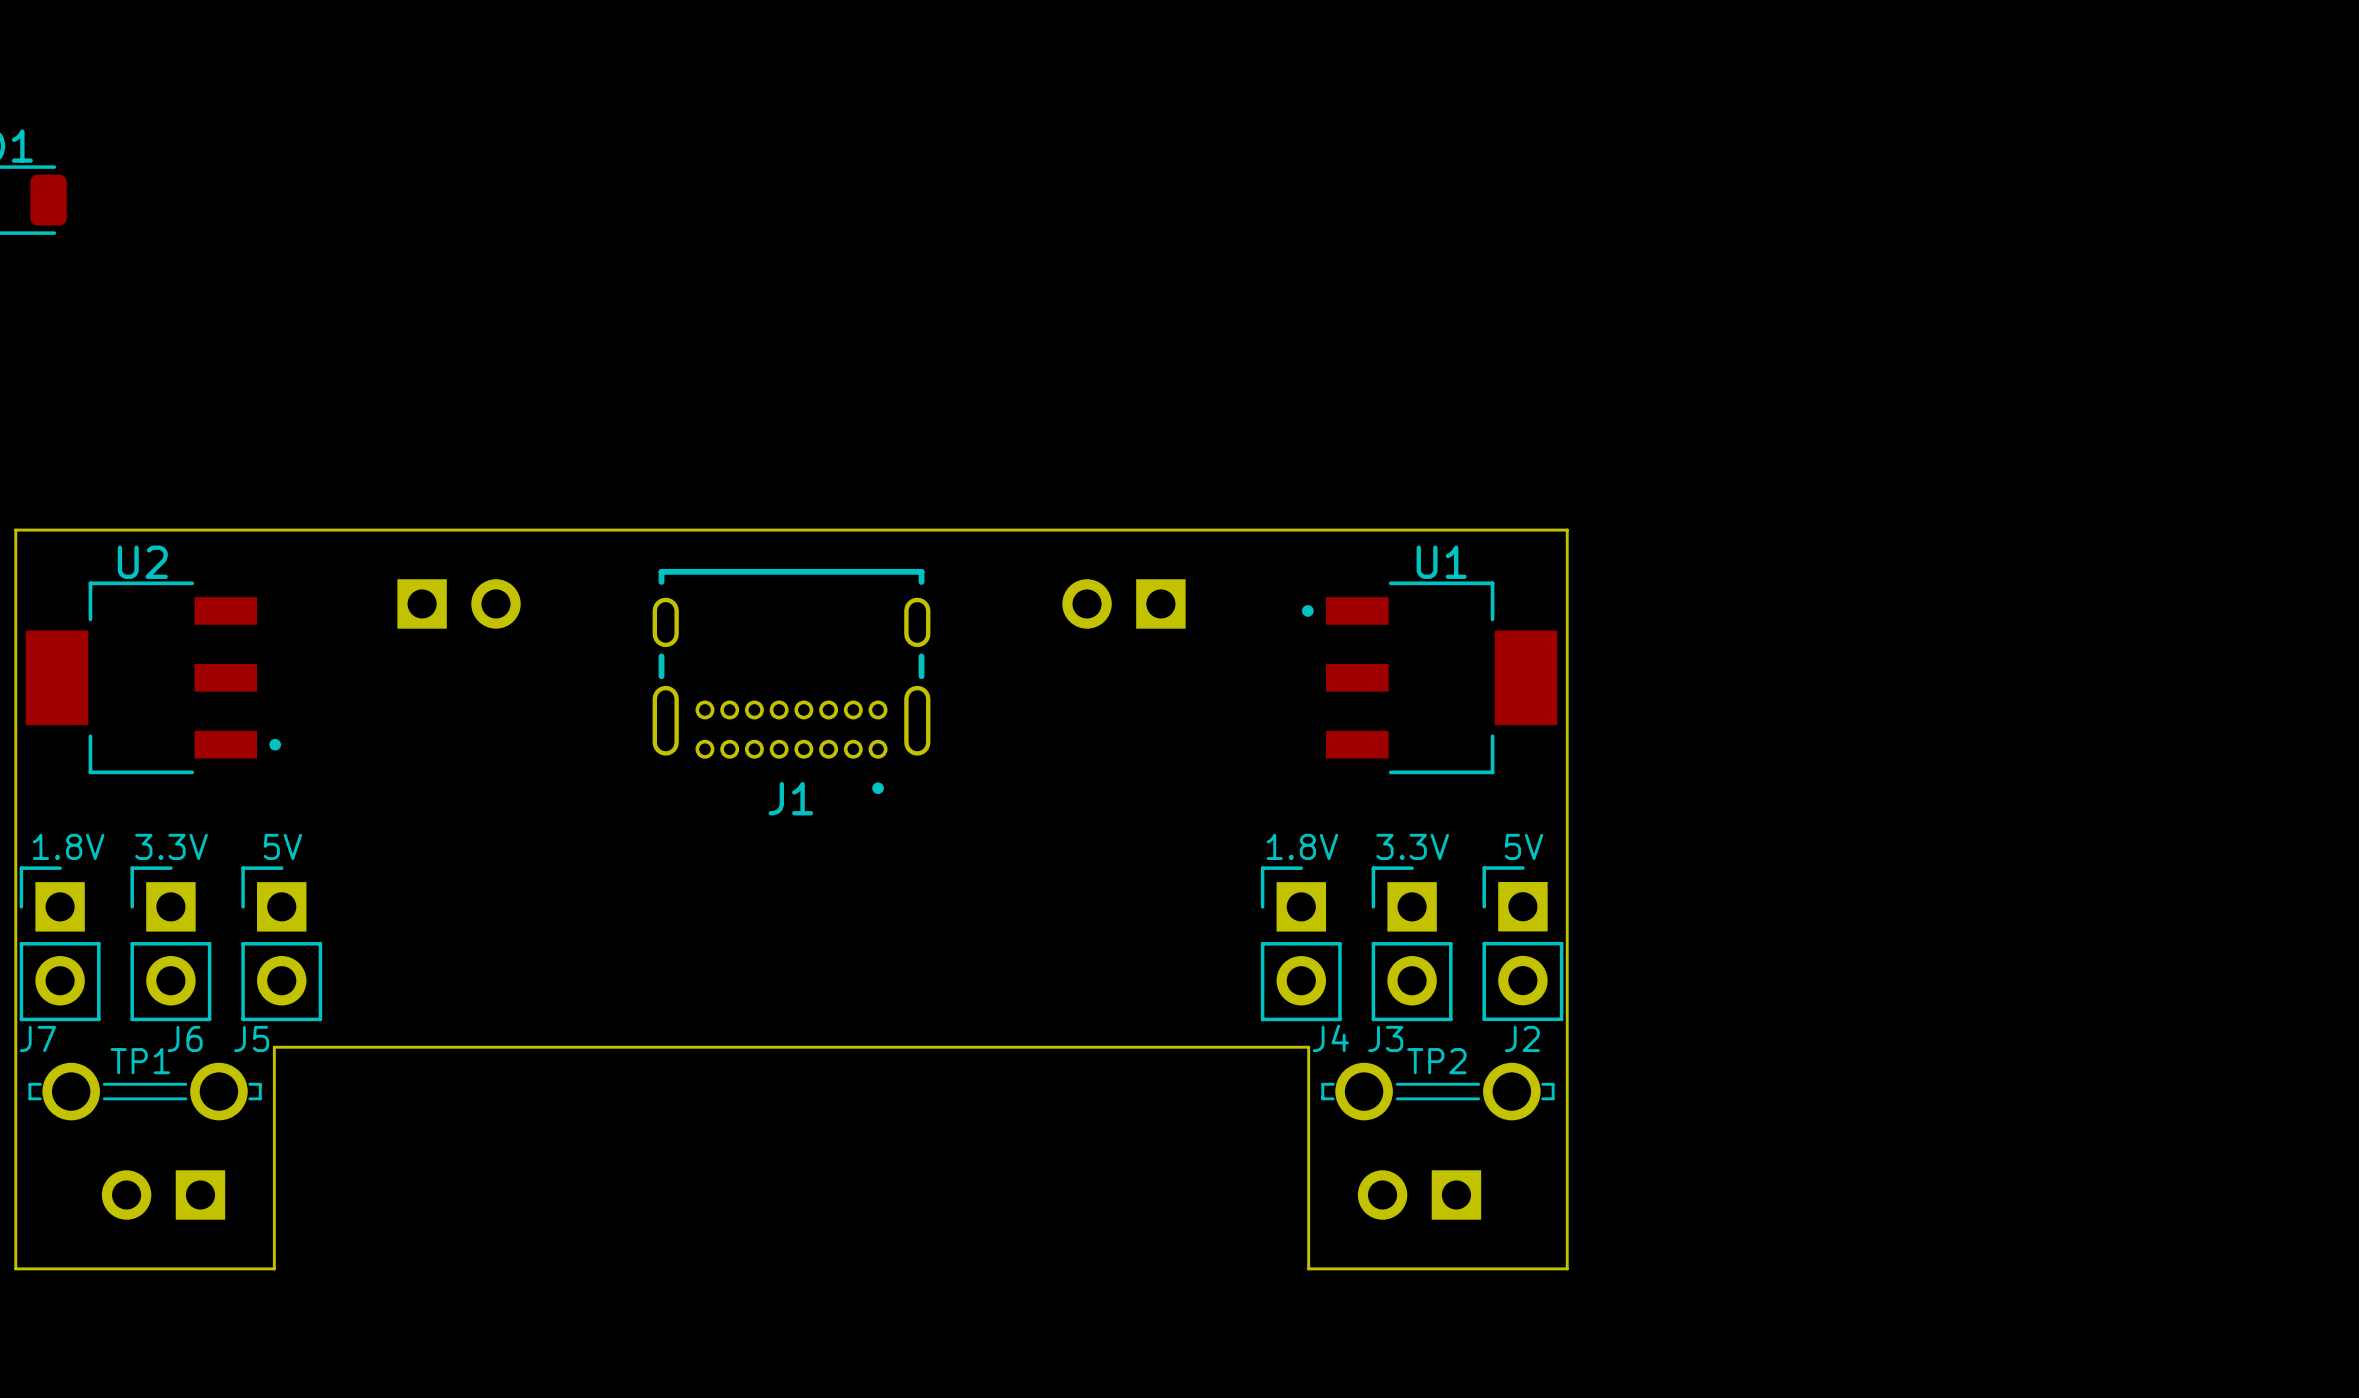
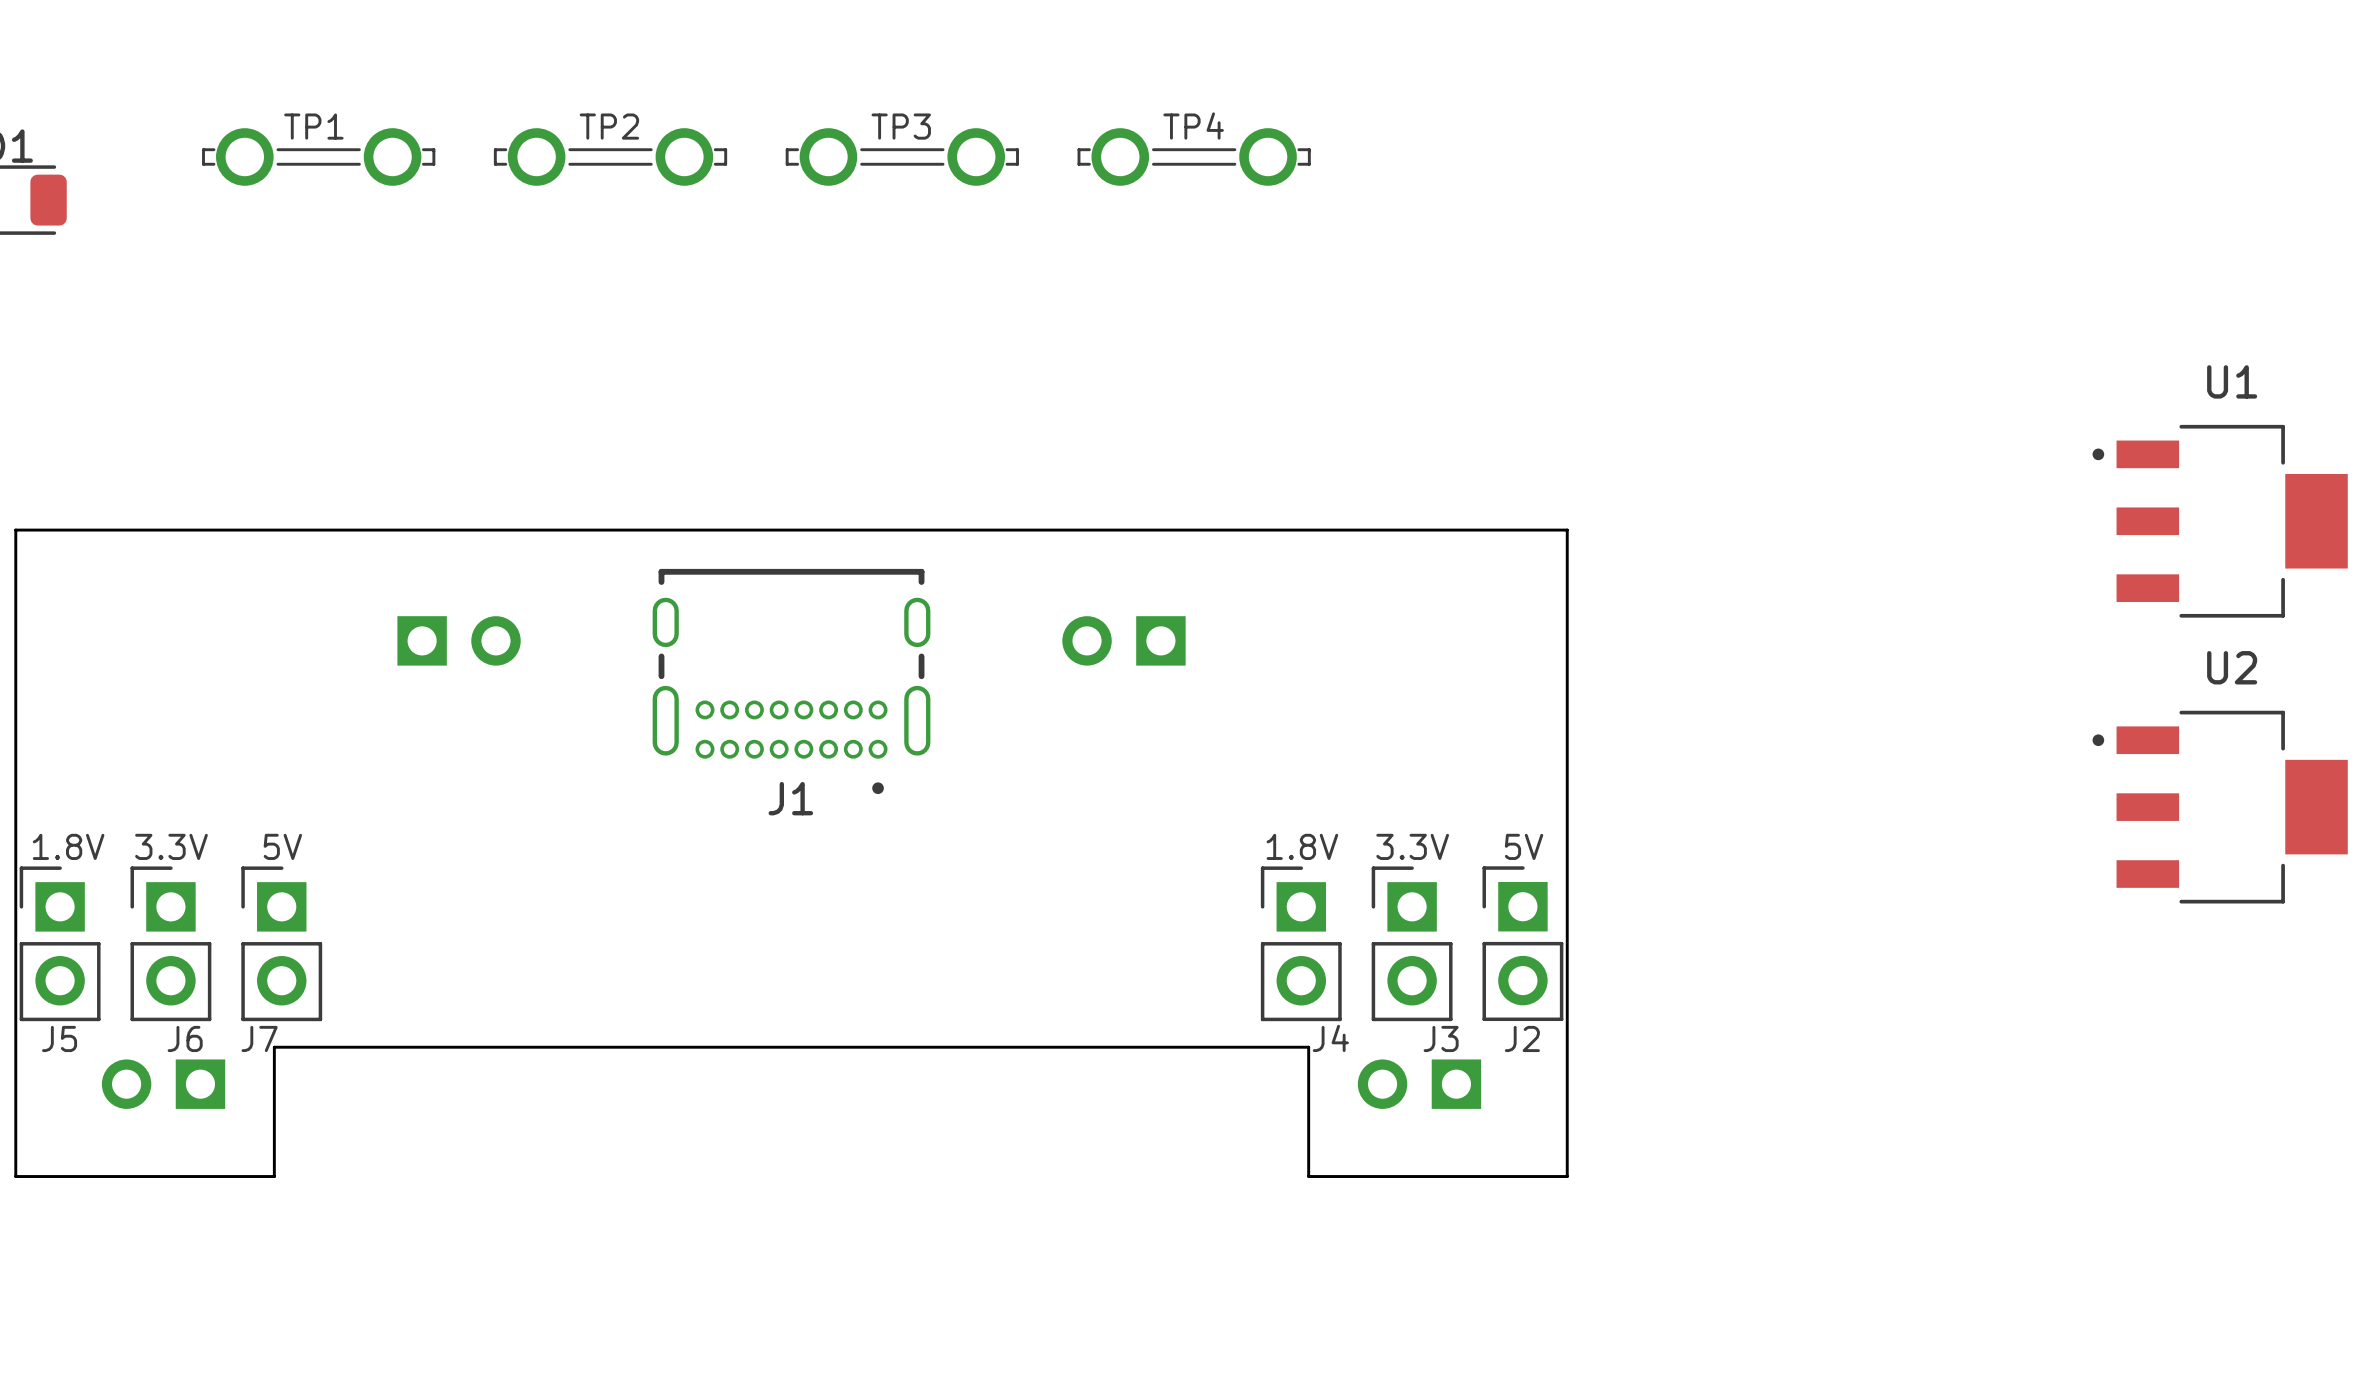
TP3: none -> (902, 156)
TP4: none -> (1194, 156)
U1 name position: U1 (1441, 562) -> U1 (2232, 381)
part position: (459, 603) -> (459, 640)
part position: (1123, 603) -> (1123, 640)
U2 rotation: 0° (153, 677) -> 180° (2220, 807)
U2 position: (153, 677) -> (2220, 807)
U1 position: (1429, 677) -> (2220, 521)
J7 name: J7 (37, 1038) -> J5 (59, 1038)
J5 name: J5 (251, 1038) -> J7 (259, 1038)
J3 name position: J3 (1385, 1038) -> J3 (1441, 1038)
TP1 position: (145, 1091) -> (318, 156)
TP2 position: (1437, 1091) -> (610, 156)
board edge: (15, 1176) (15, 1268) (274, 1268) (274, 1176) -> (15, 1176) (274, 1176)
board edge: (1308, 1176) (1308, 1268) (1567, 1268) (1567, 1176) -> (1308, 1176) (1567, 1176)
part position: (163, 1194) -> (163, 1084)
part position: (1419, 1194) -> (1419, 1084)

